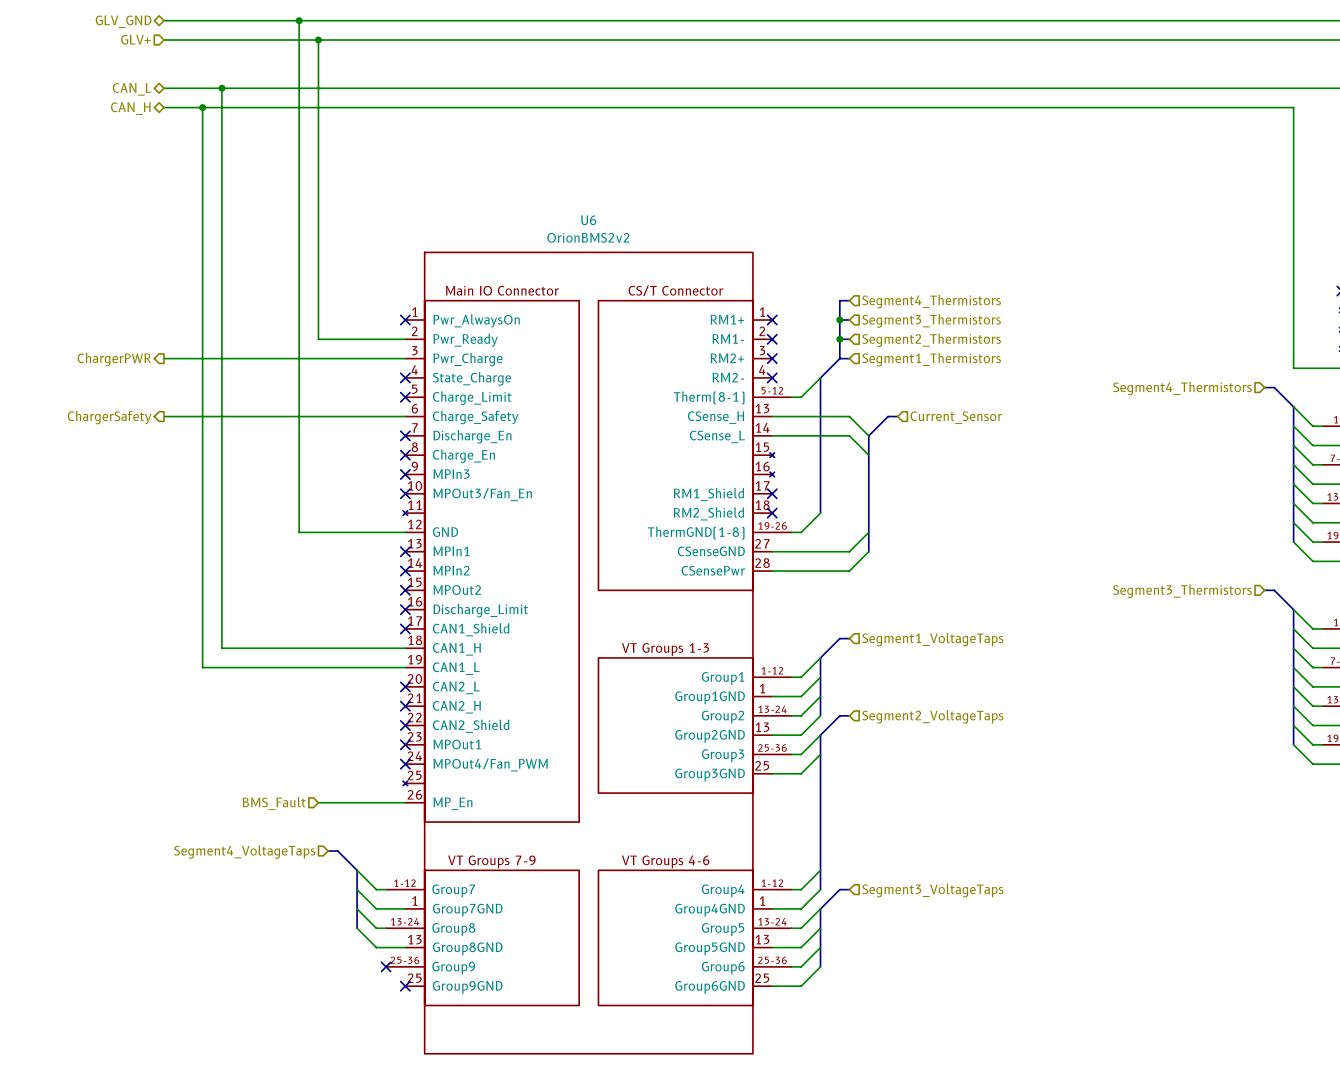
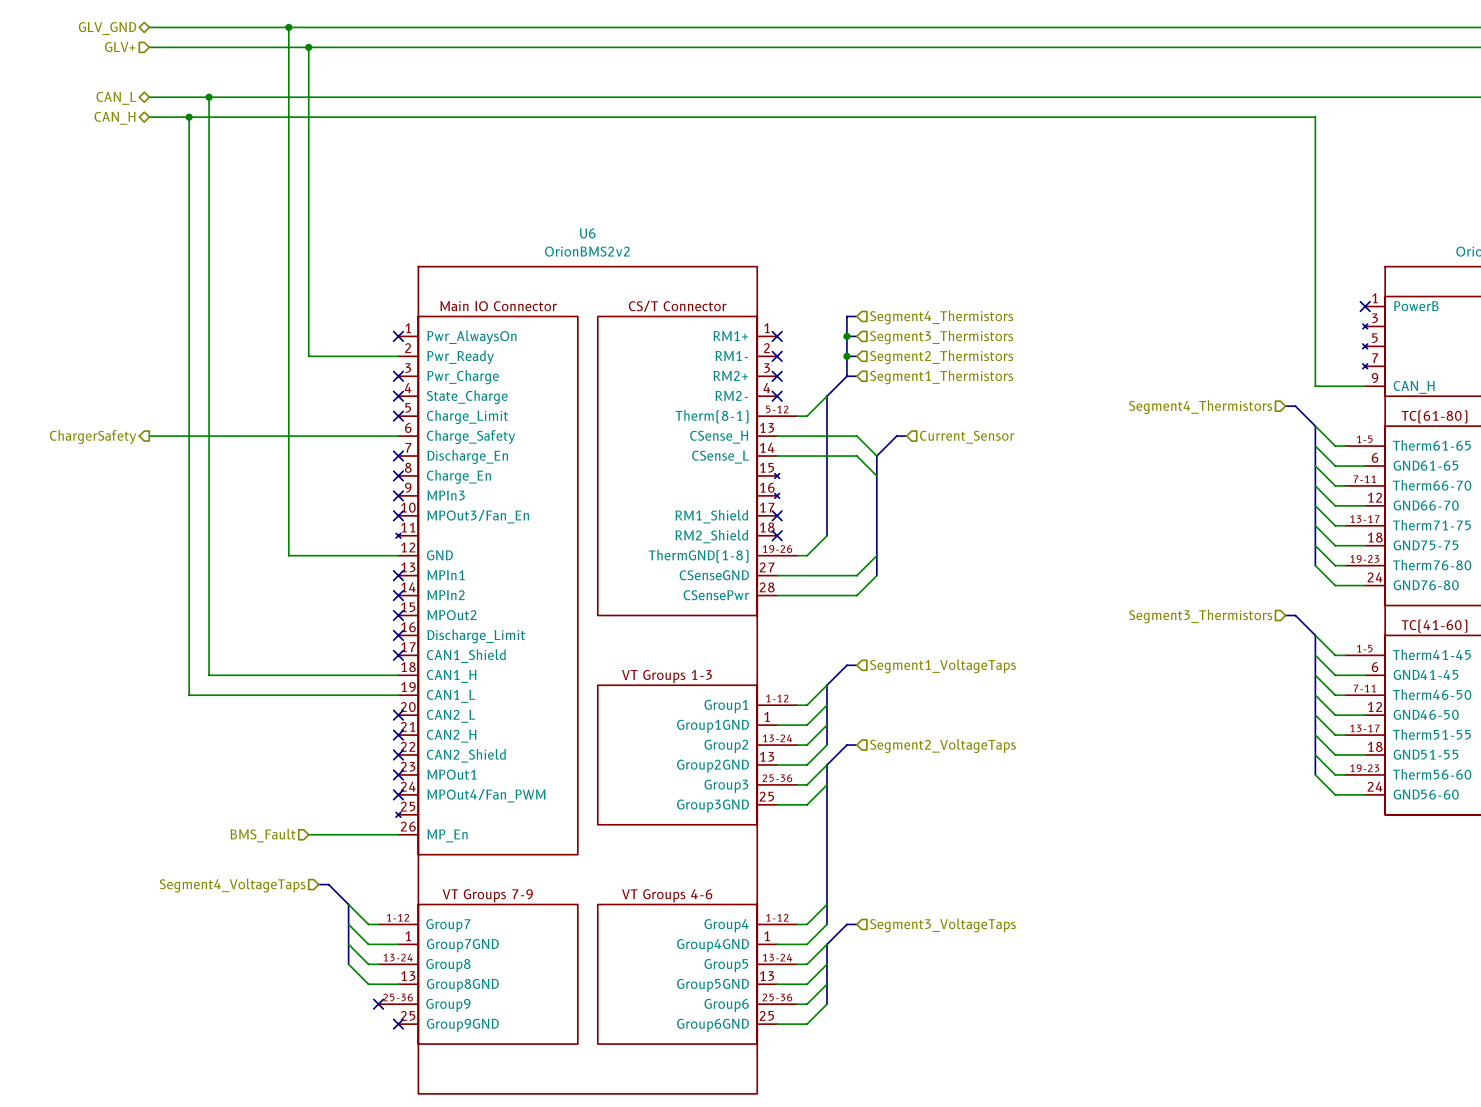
wire: (163, 358) (405, 358) -> none
no-connect mark: none -> (398, 376)
hierarchical label: ChargerPWR (114, 359) -> none

